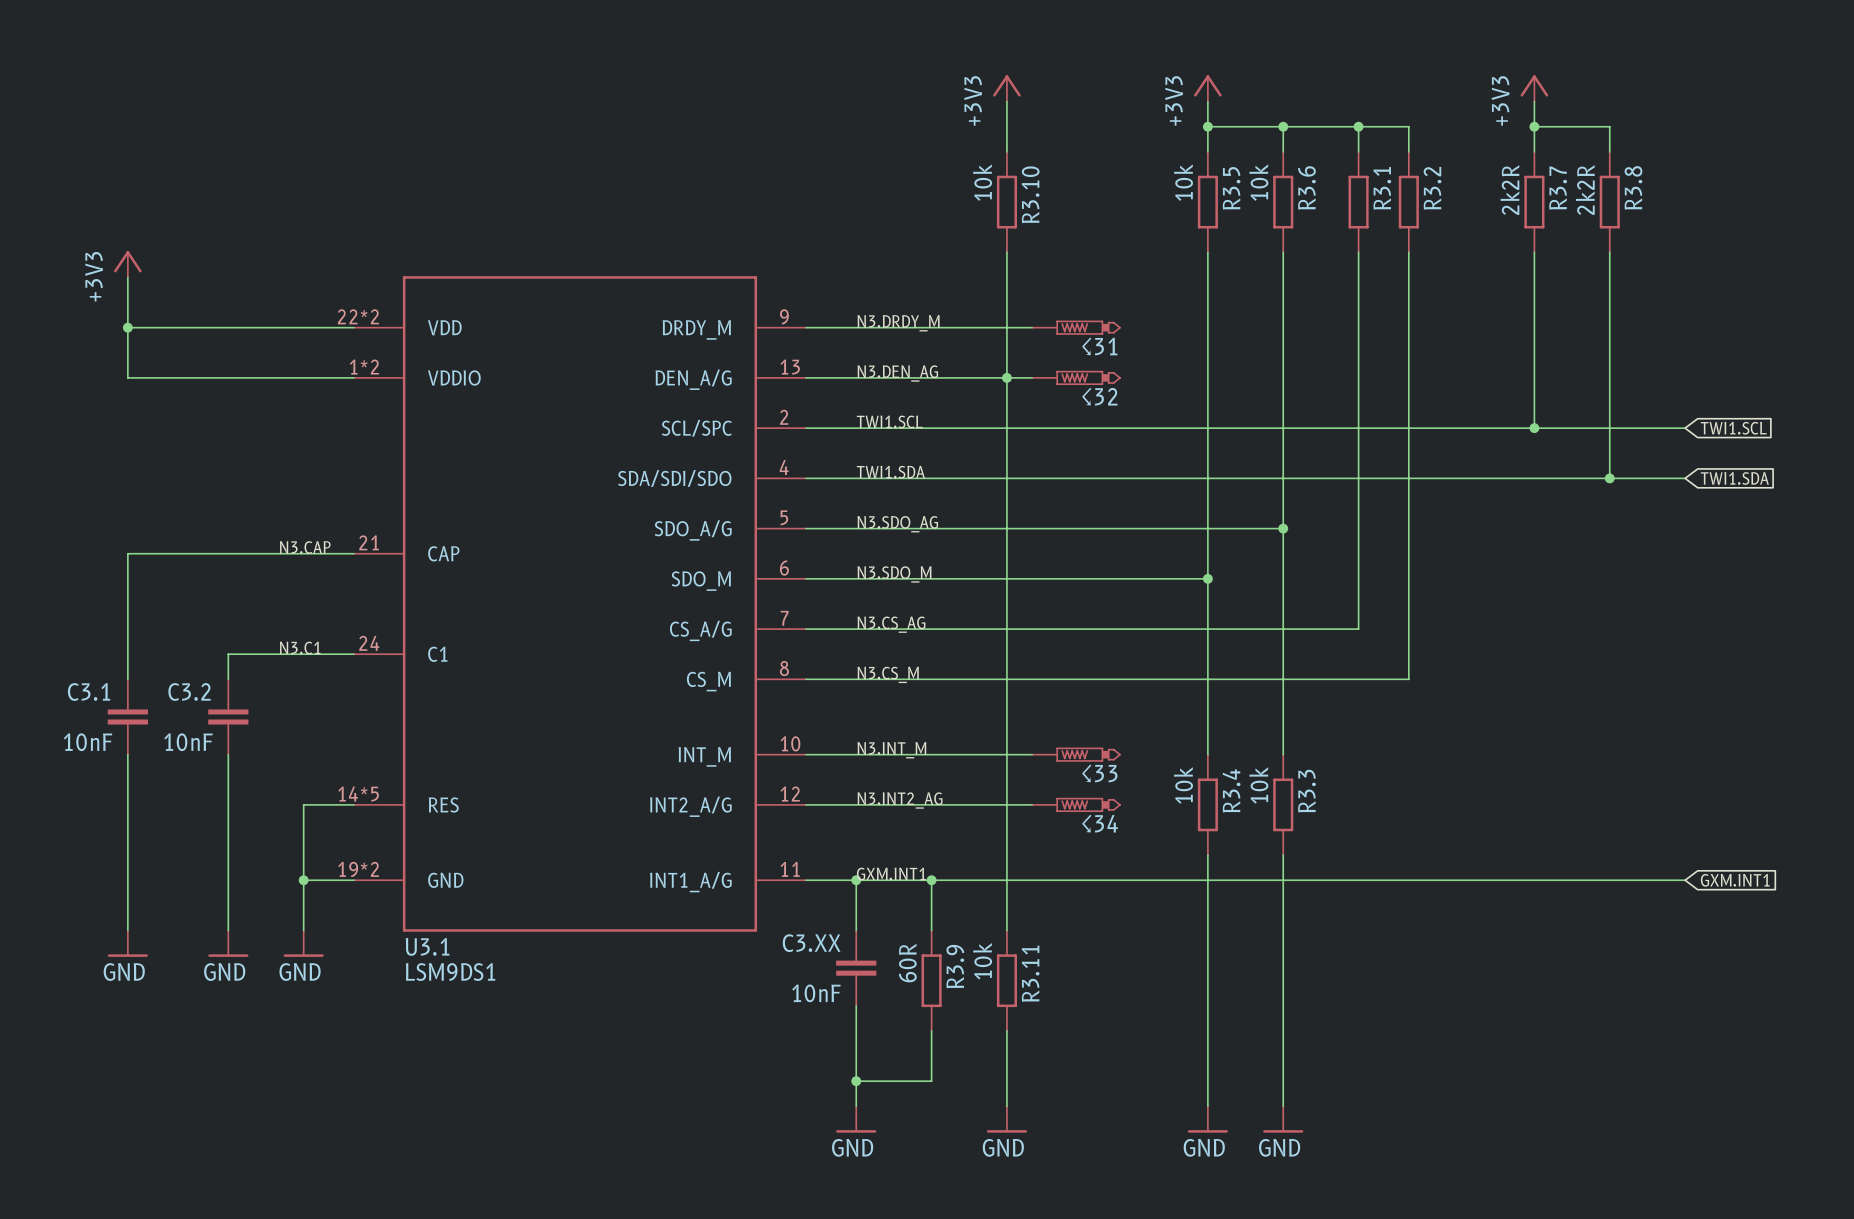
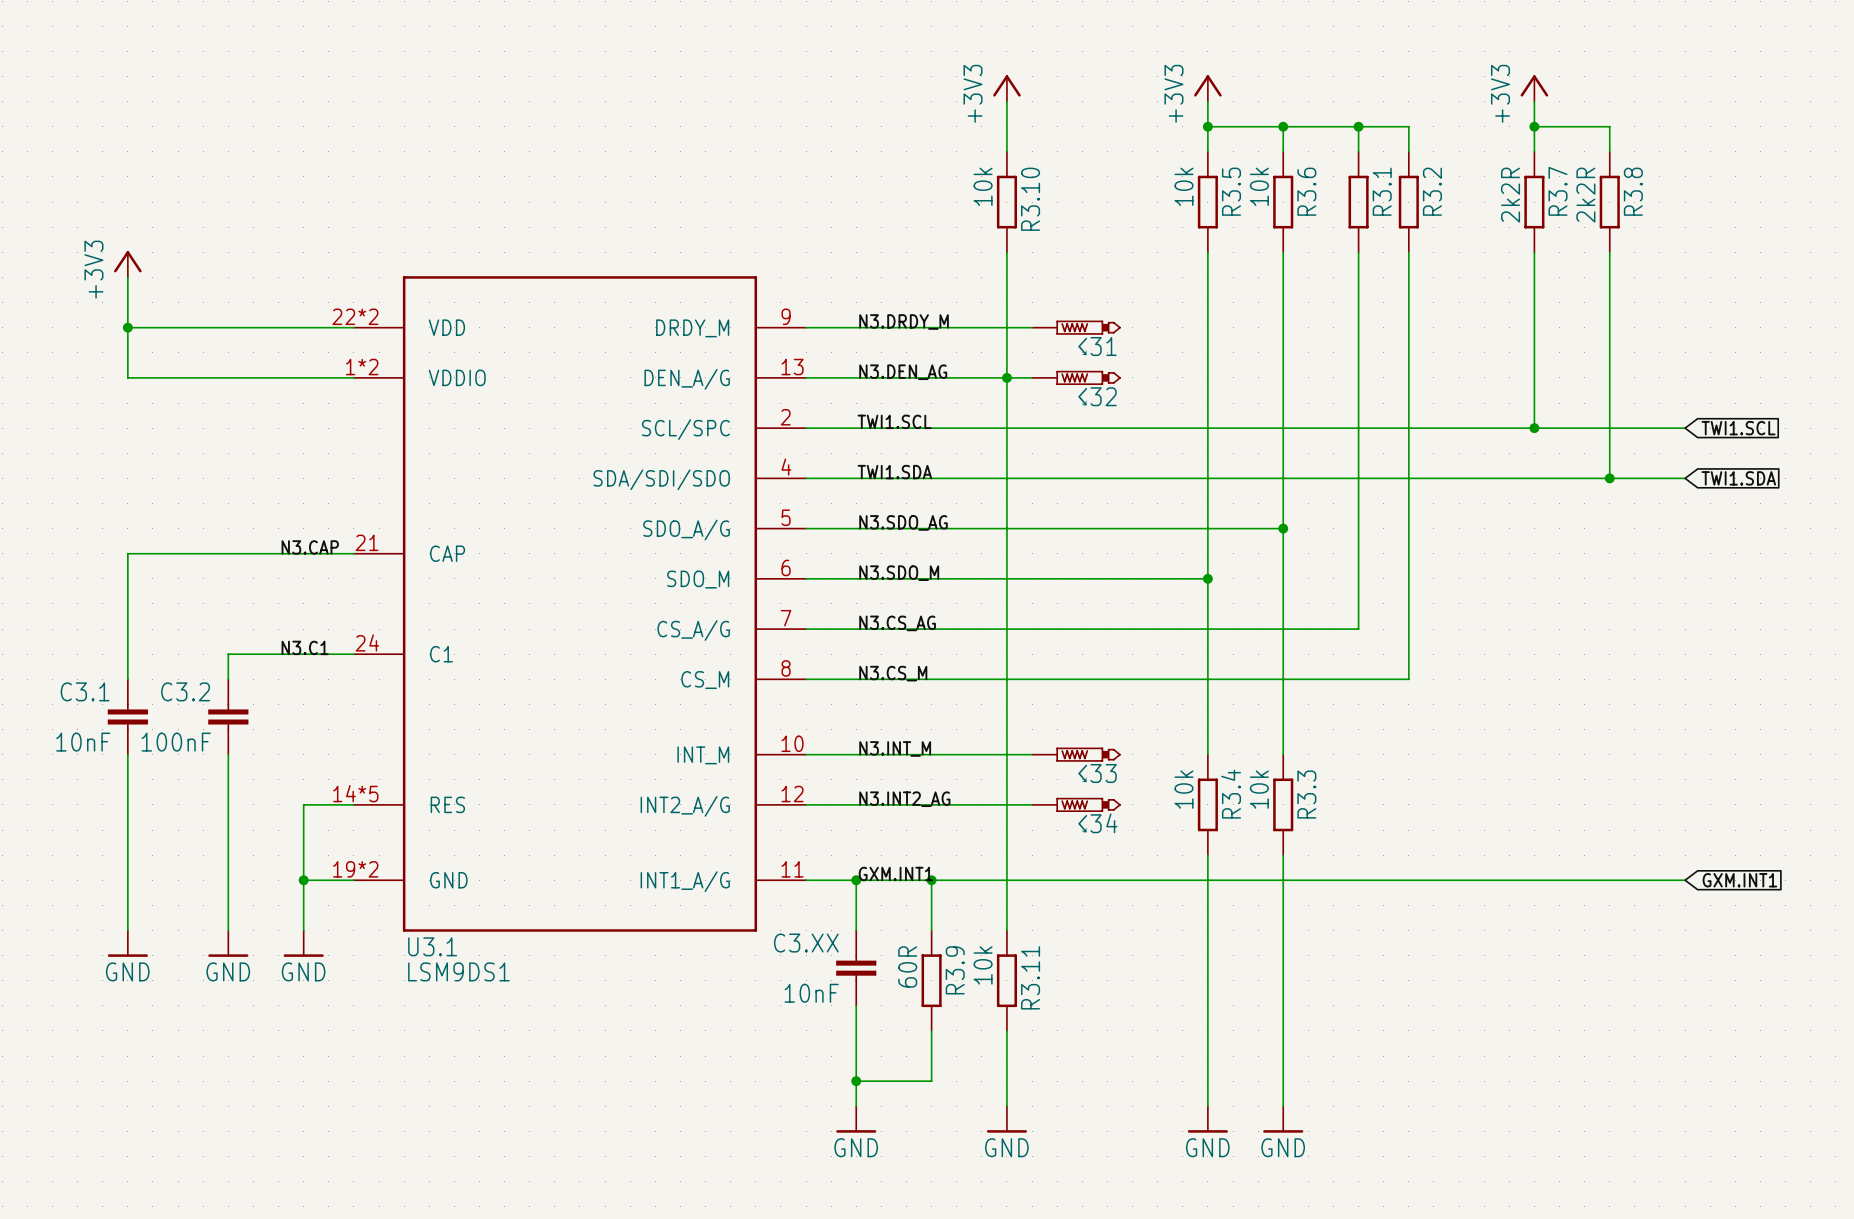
C3.2 value: 10nF (188, 742) -> 100nF (176, 742)

